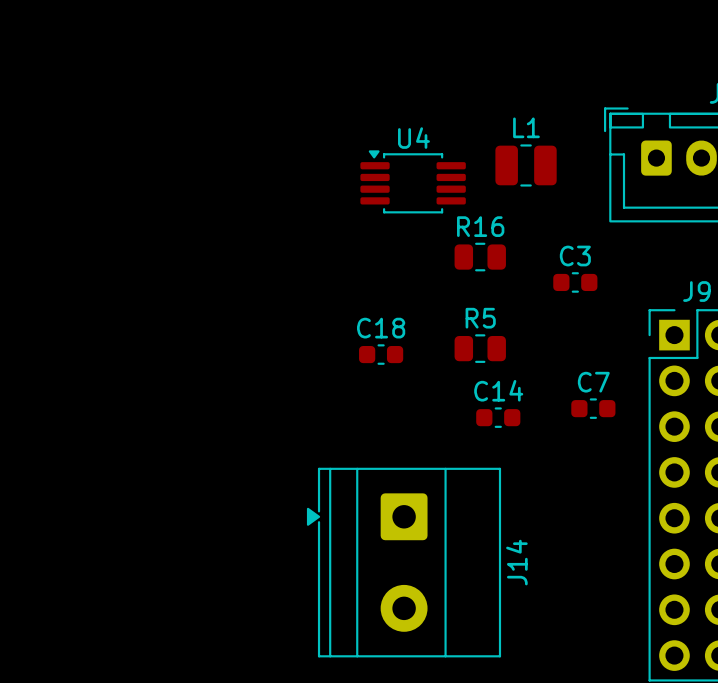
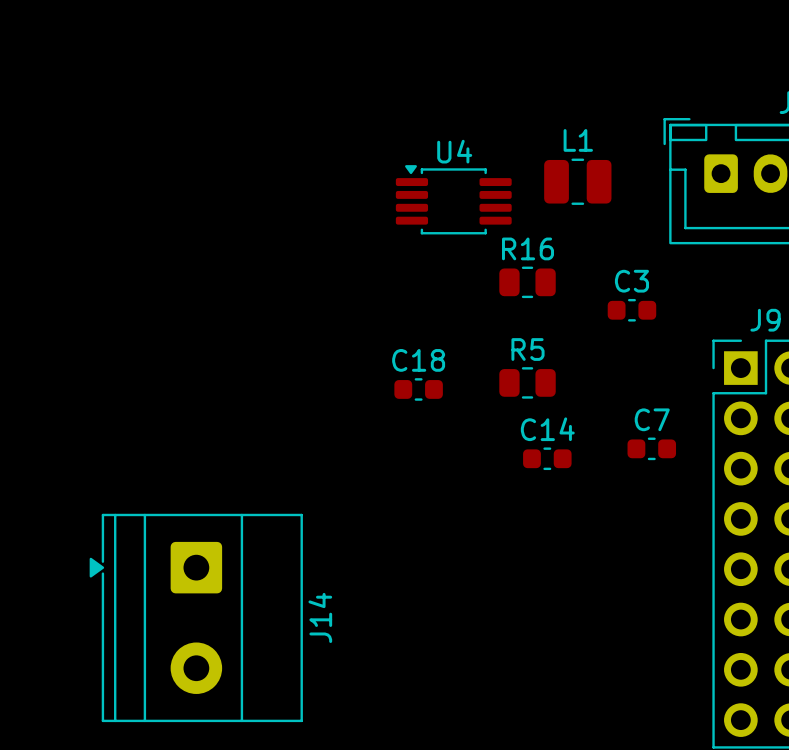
J14 position: (404, 562) -> (196, 617)

